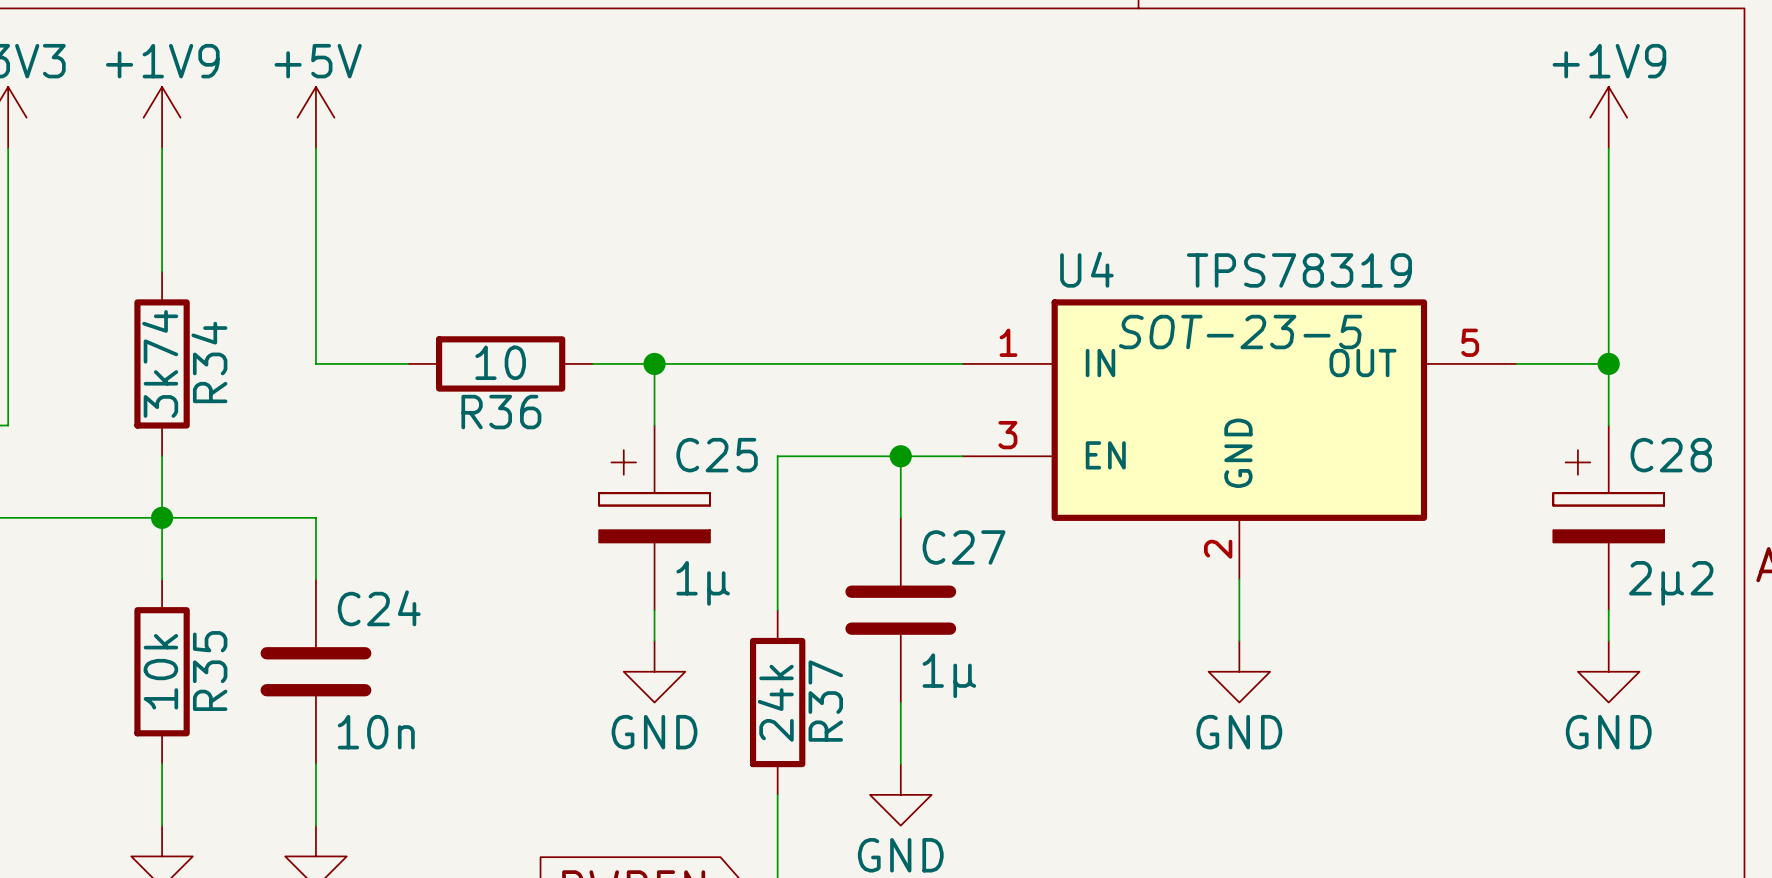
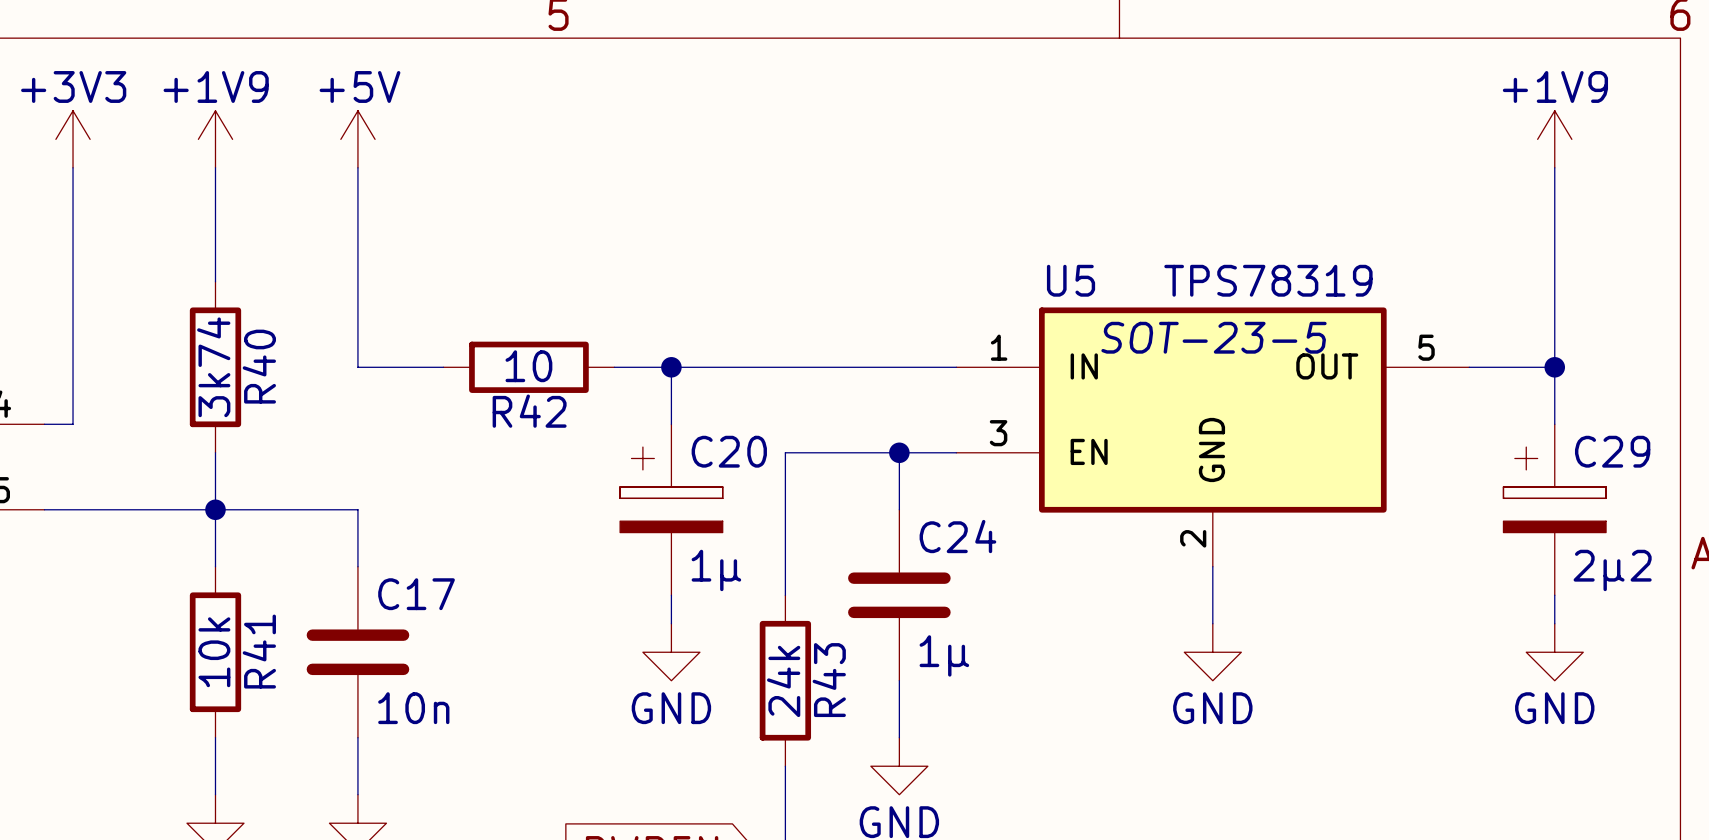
U4 name: U4 (1086, 269) -> U5 (1071, 280)
R34 name: R34 (209, 362) -> R40 (259, 366)
R36 name: R36 (501, 412) -> R42 (529, 411)
C25 name: C25 (717, 455) -> C20 (729, 451)
C28 name: C28 (1671, 455) -> C29 (1612, 451)
C27 name: C27 (964, 547) -> C24 (957, 536)
C24 name: C24 (379, 608) -> C17 (416, 594)
R35 name: R35 (210, 671) -> R41 (259, 651)
R37 name: R37 (825, 701) -> R43 (829, 680)

